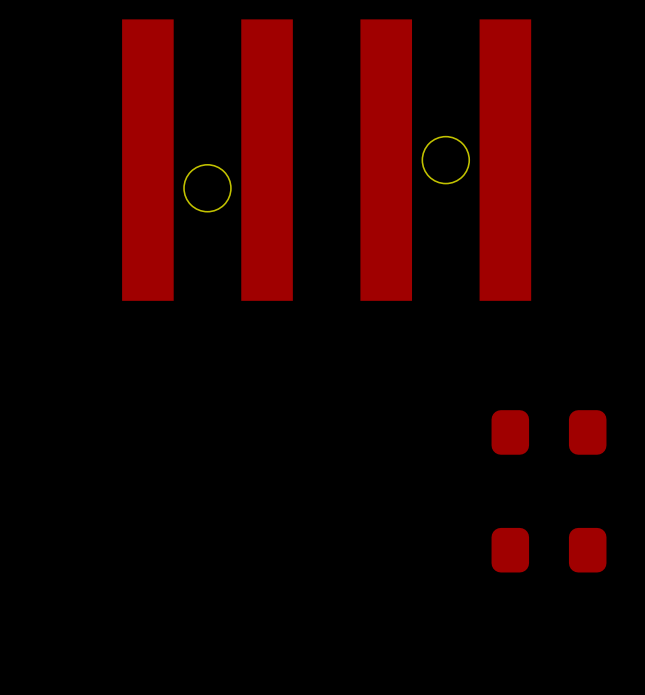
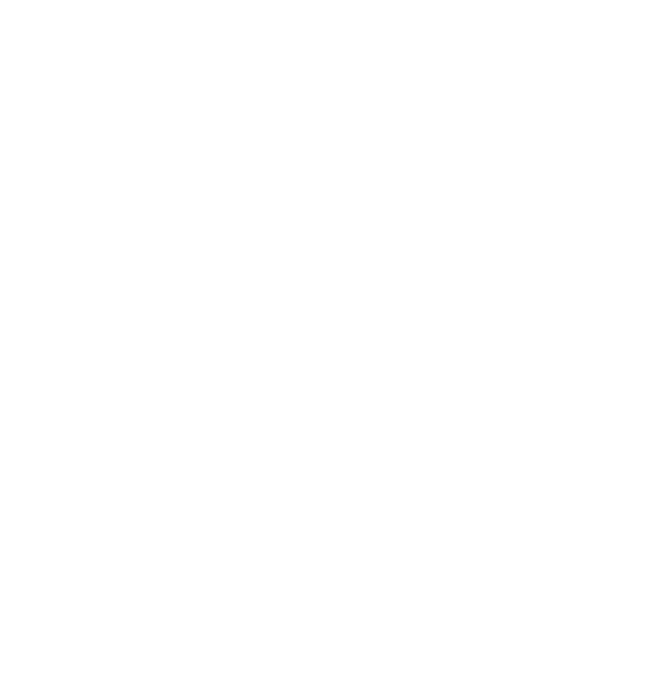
part: (326, 160) -> none
part: (549, 432) -> none
part: (549, 550) -> none

